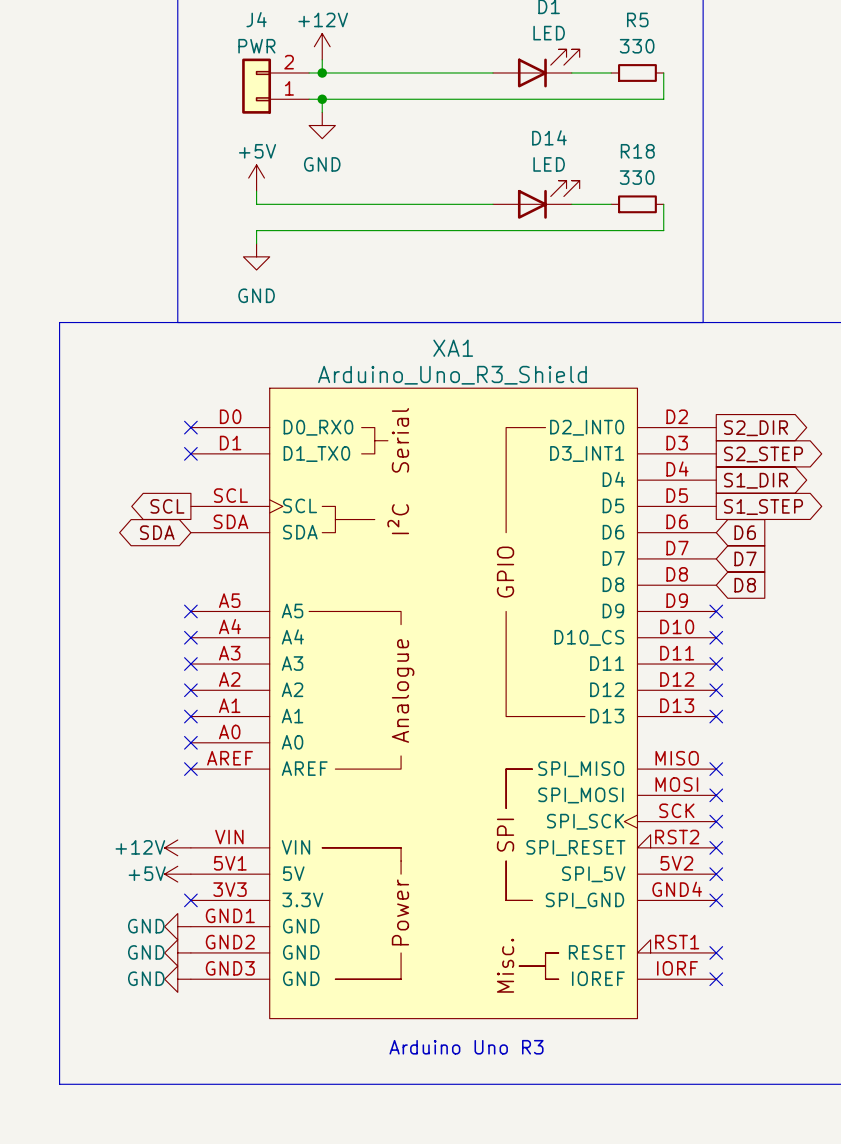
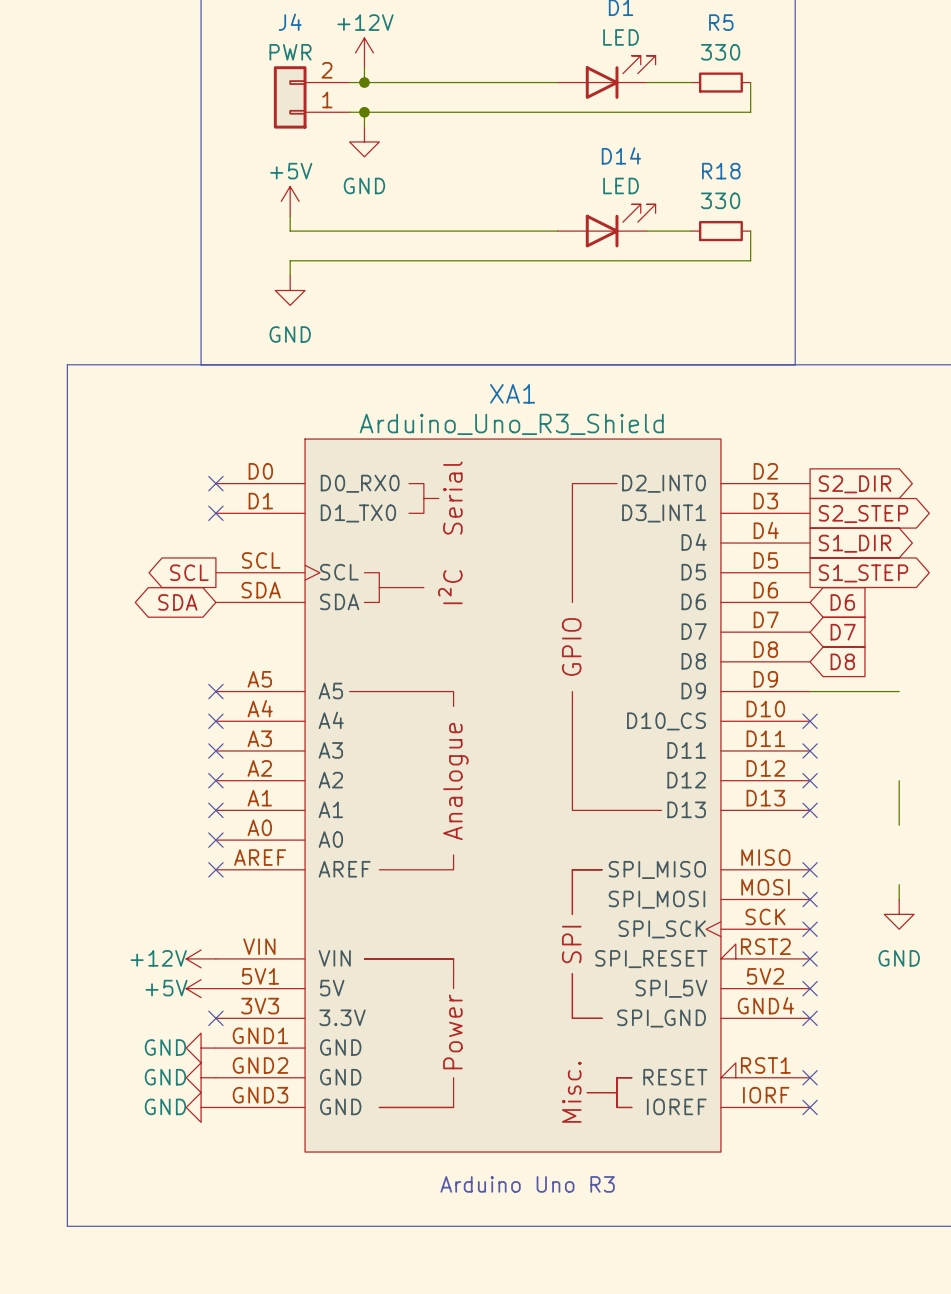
wire: none -> (810, 691) (899, 691)
no-connect mark: (716, 611) -> none
wire: none -> (899, 780) (899, 825)
wire: none -> (899, 884) (899, 899)
power symbol: none -> GND (899, 914)

